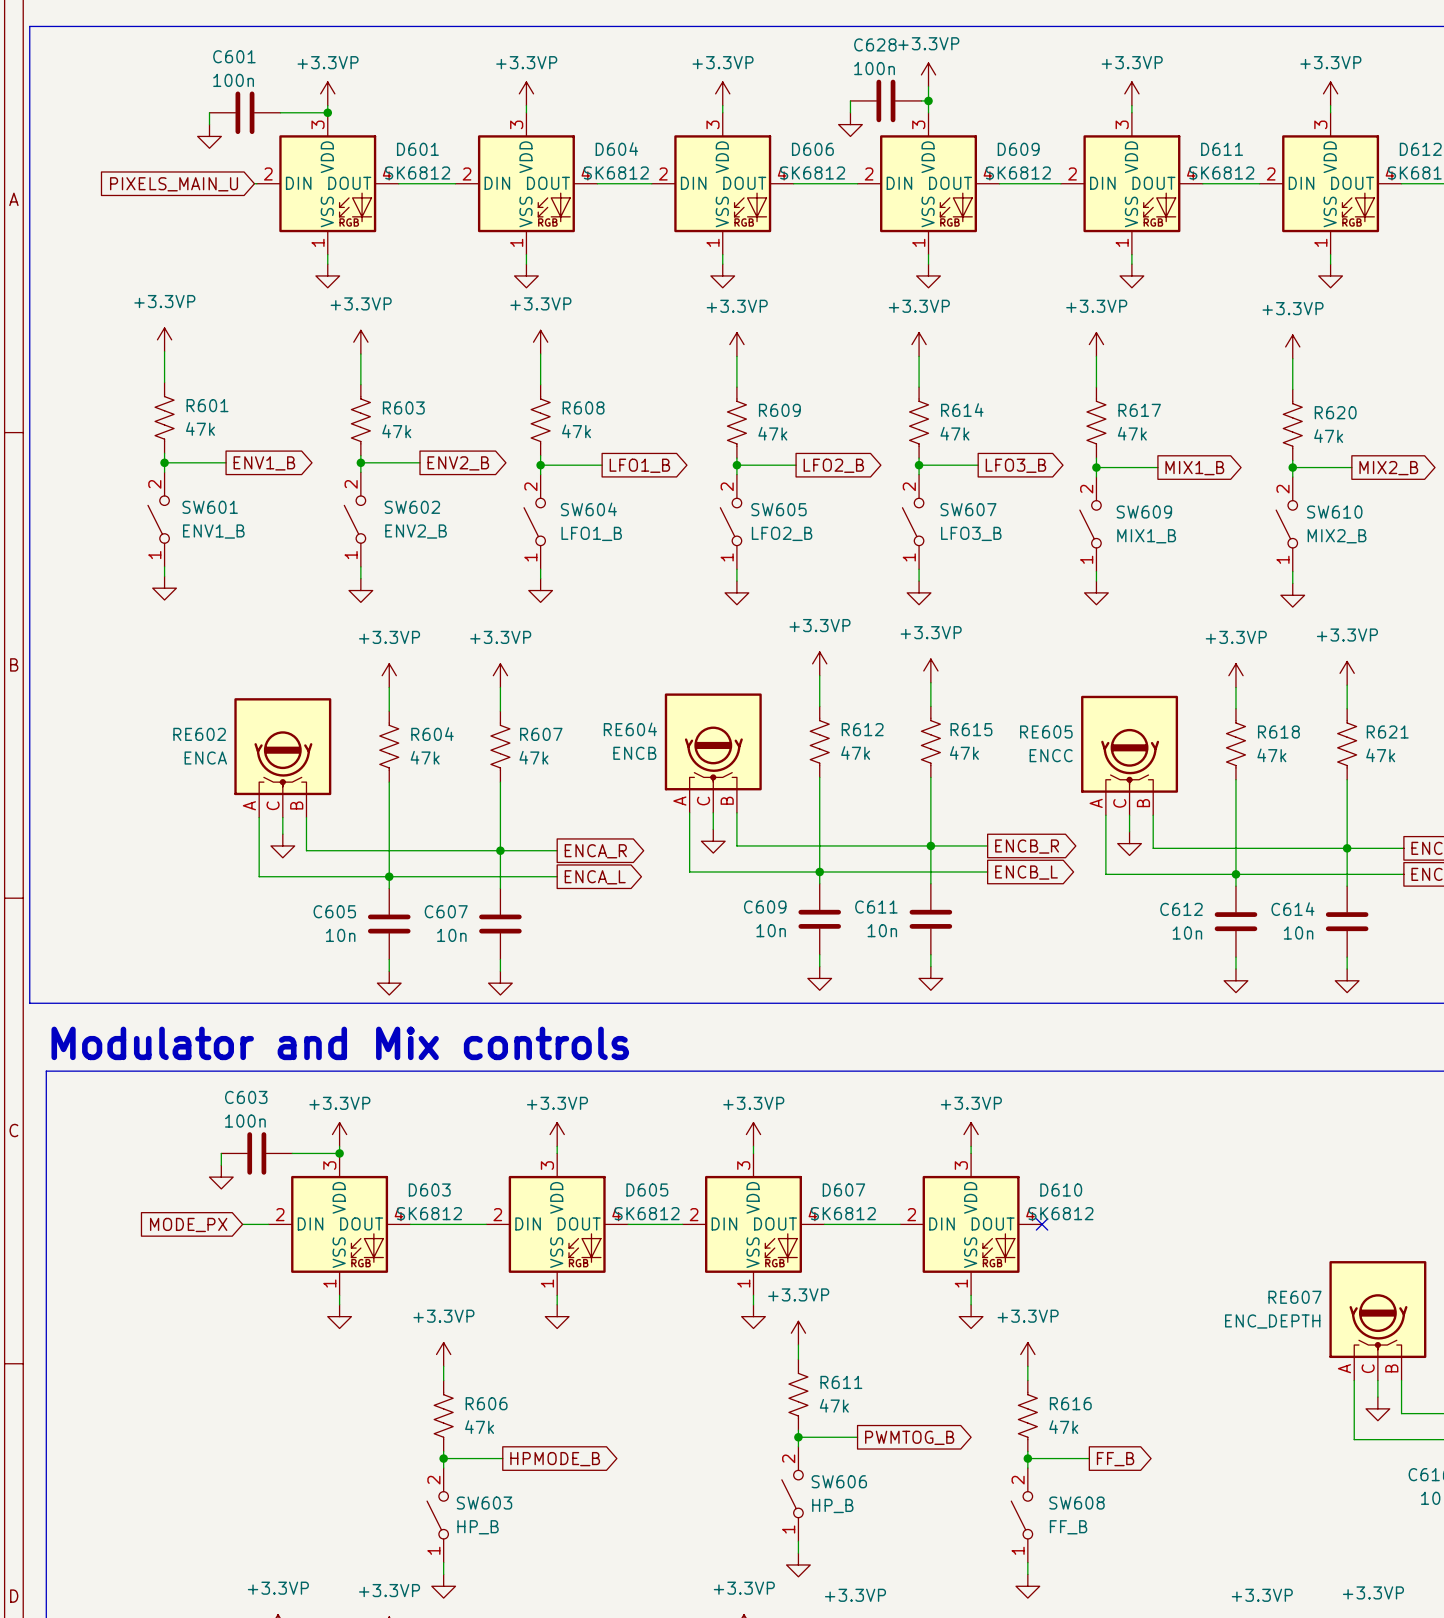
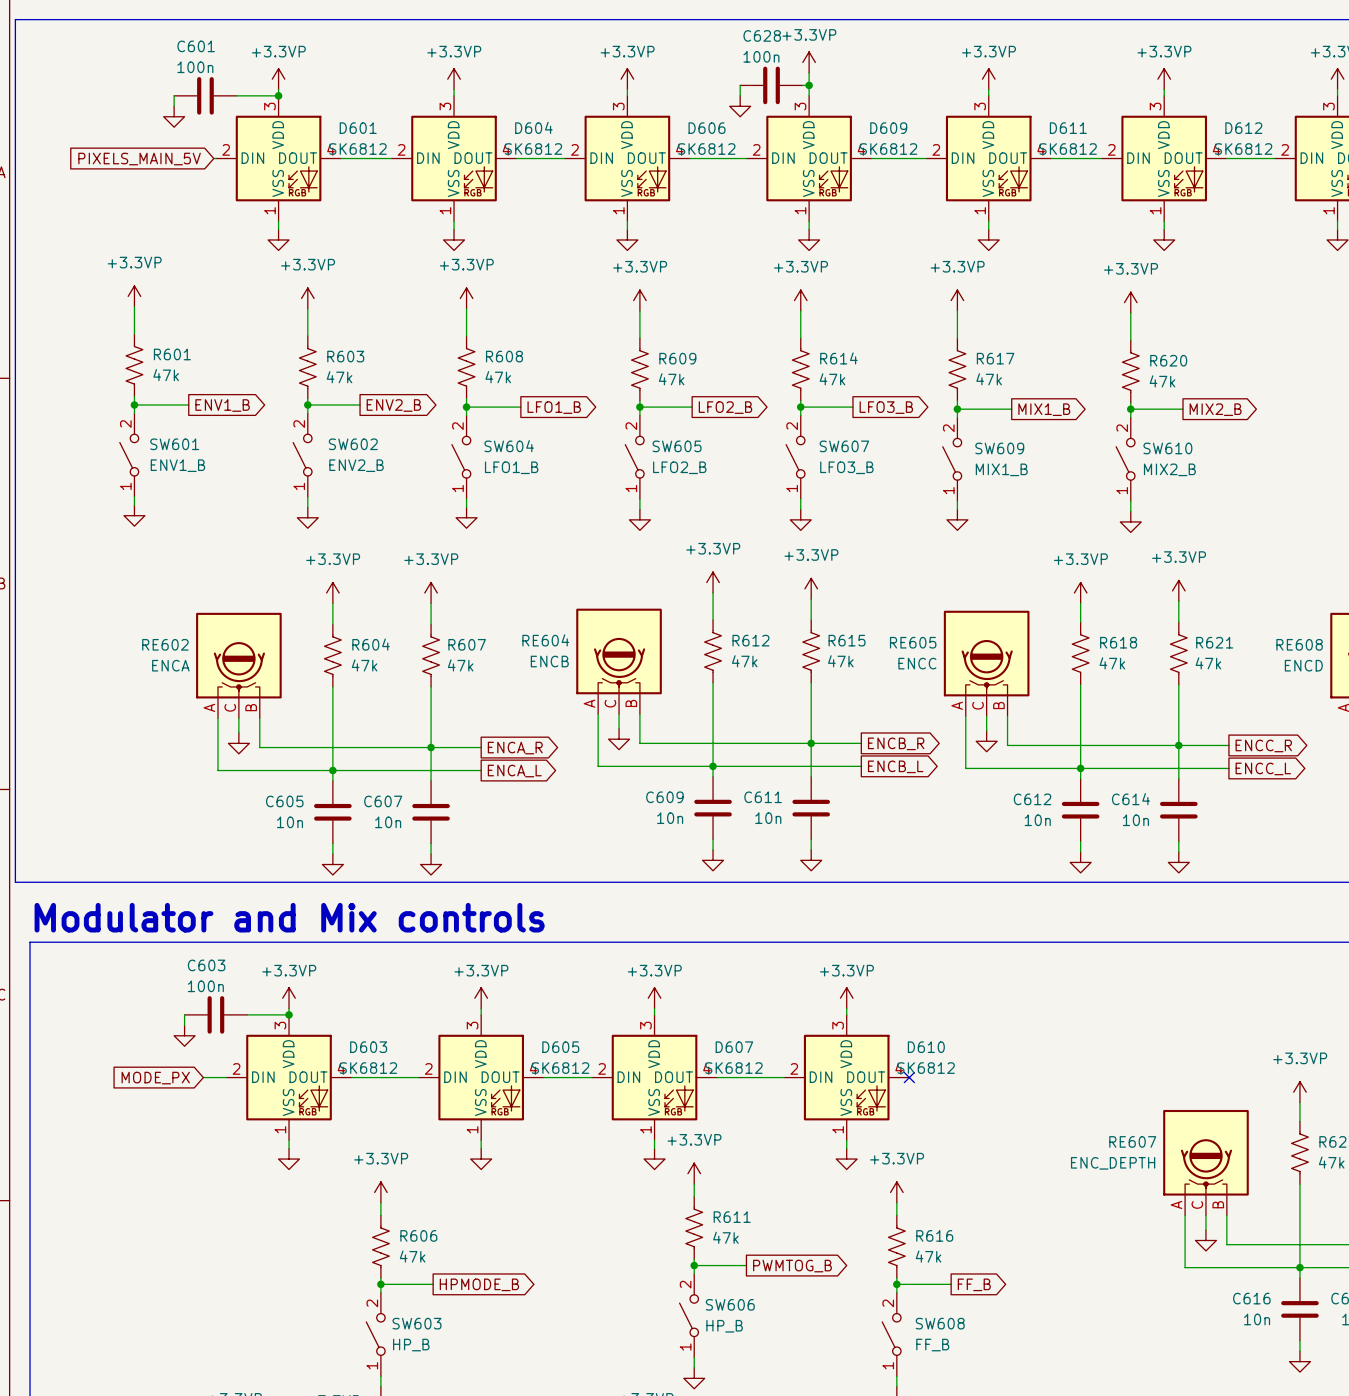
global label: PIXELS_MAIN_U (174, 184) -> PIXELS_MAIN_5V (139, 159)

